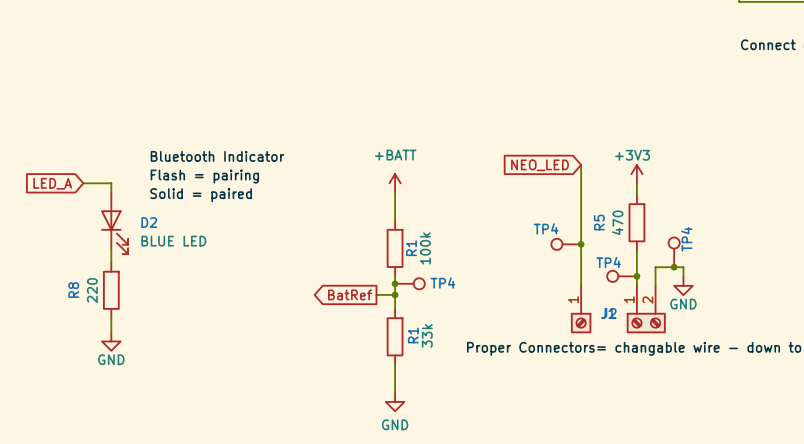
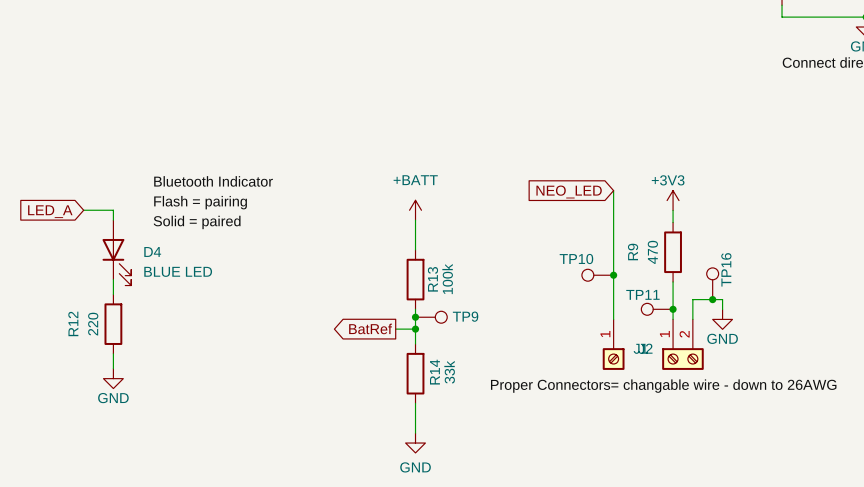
D2 name: D2 (149, 222) -> D4 (152, 251)
R5 name: R5 (599, 222) -> R9 (633, 252)
TP4 name: TP4 (546, 228) -> TP10 (576, 259)
TP4 name: TP4 (686, 239) -> TP16 (726, 269)
R1 name: R1 (411, 248) -> R13 (432, 279)
TP4 name: TP4 (608, 262) -> TP11 (642, 294)
TP4 name: TP4 (442, 283) -> TP9 (465, 316)
R8 name: R8 (73, 290) -> R12 (73, 323)
R1 name: R1 (413, 335) -> R14 (434, 372)

